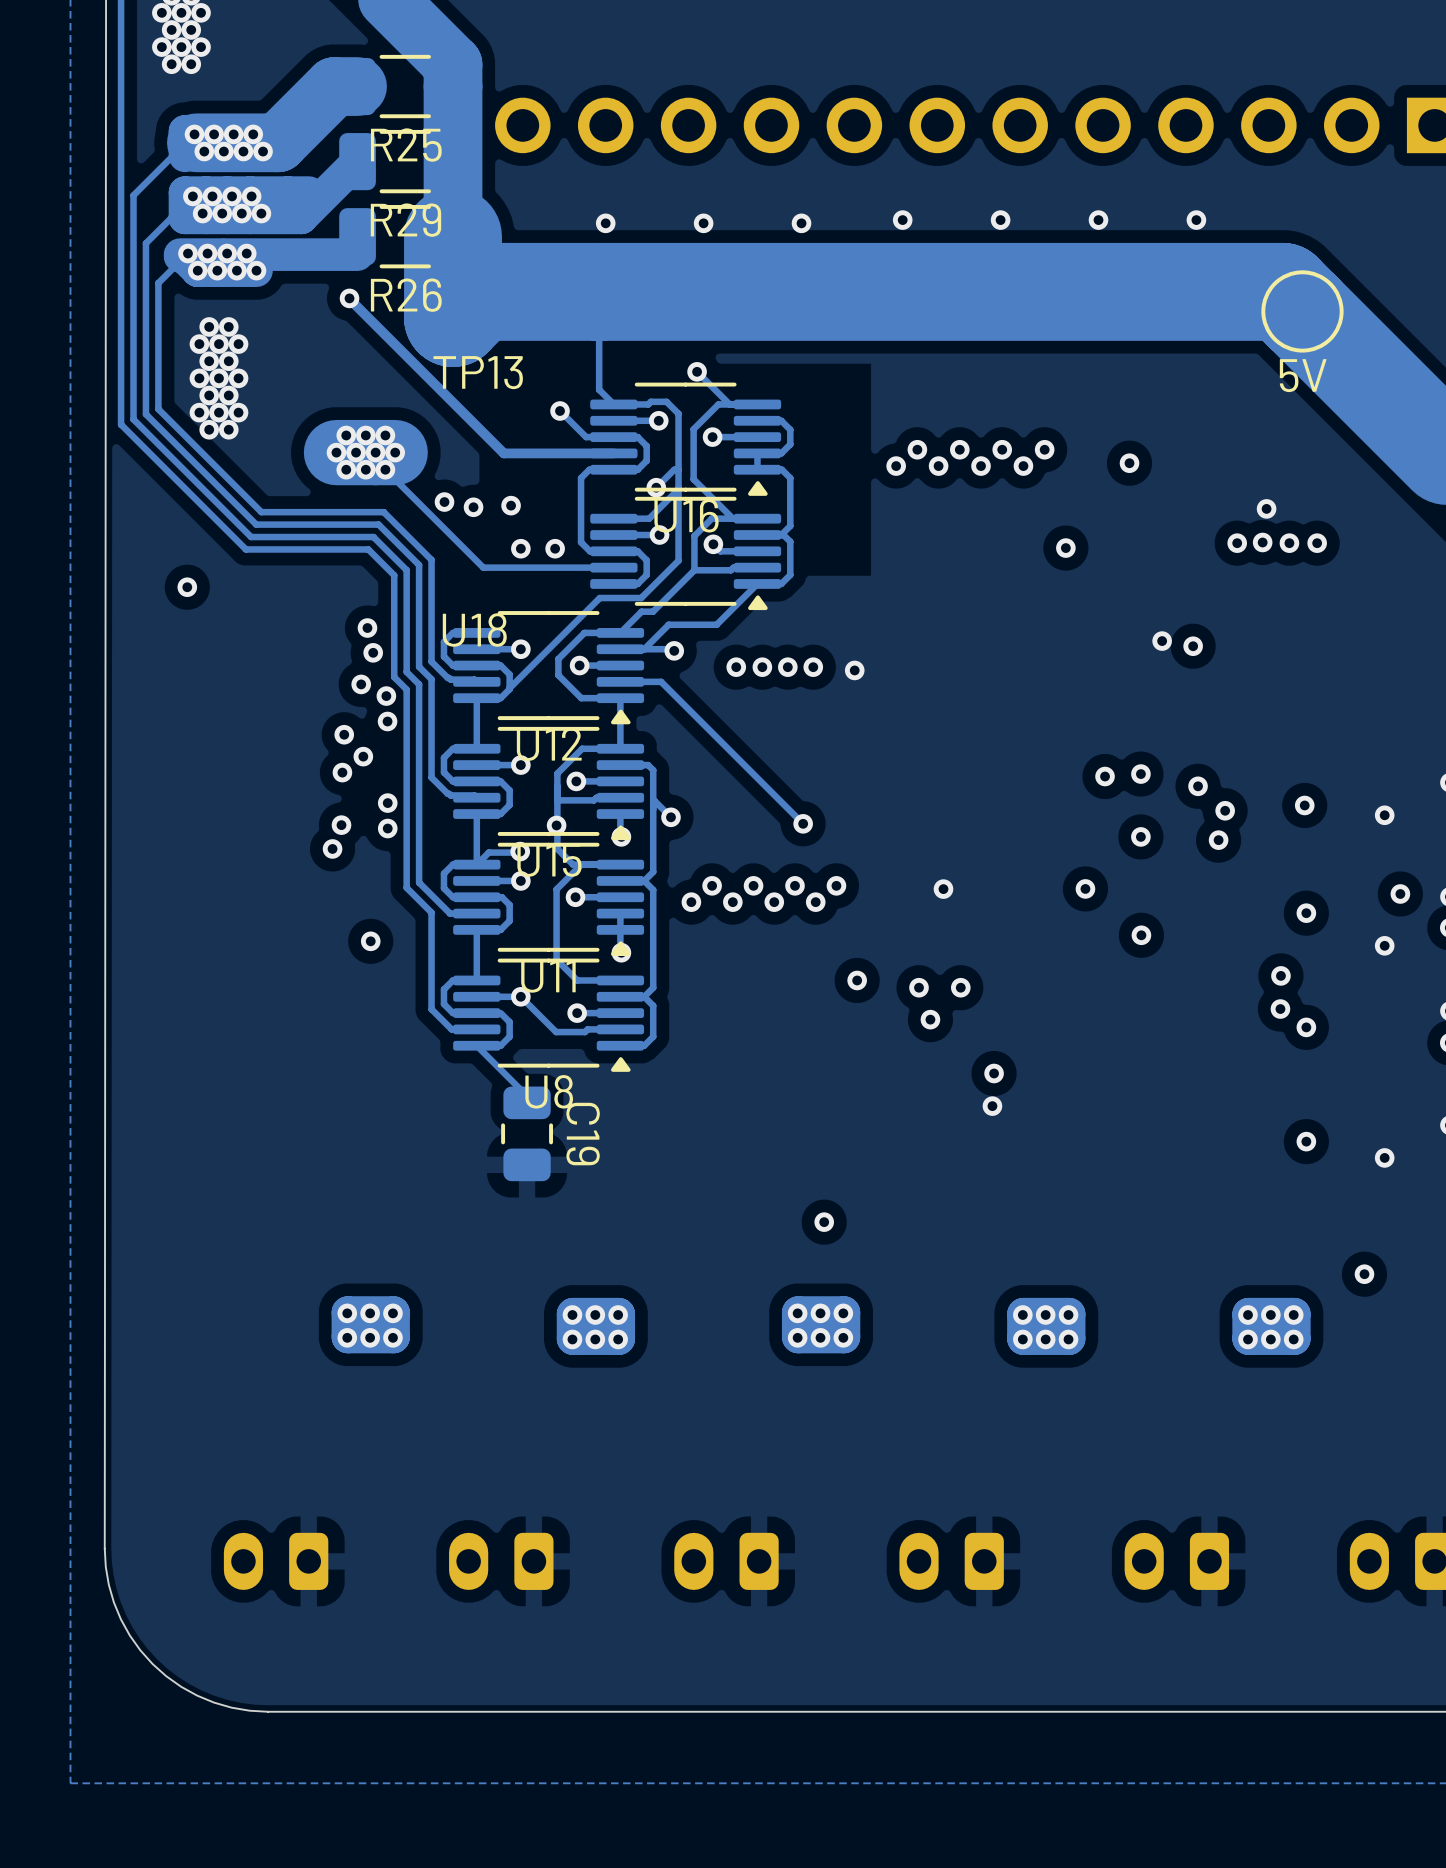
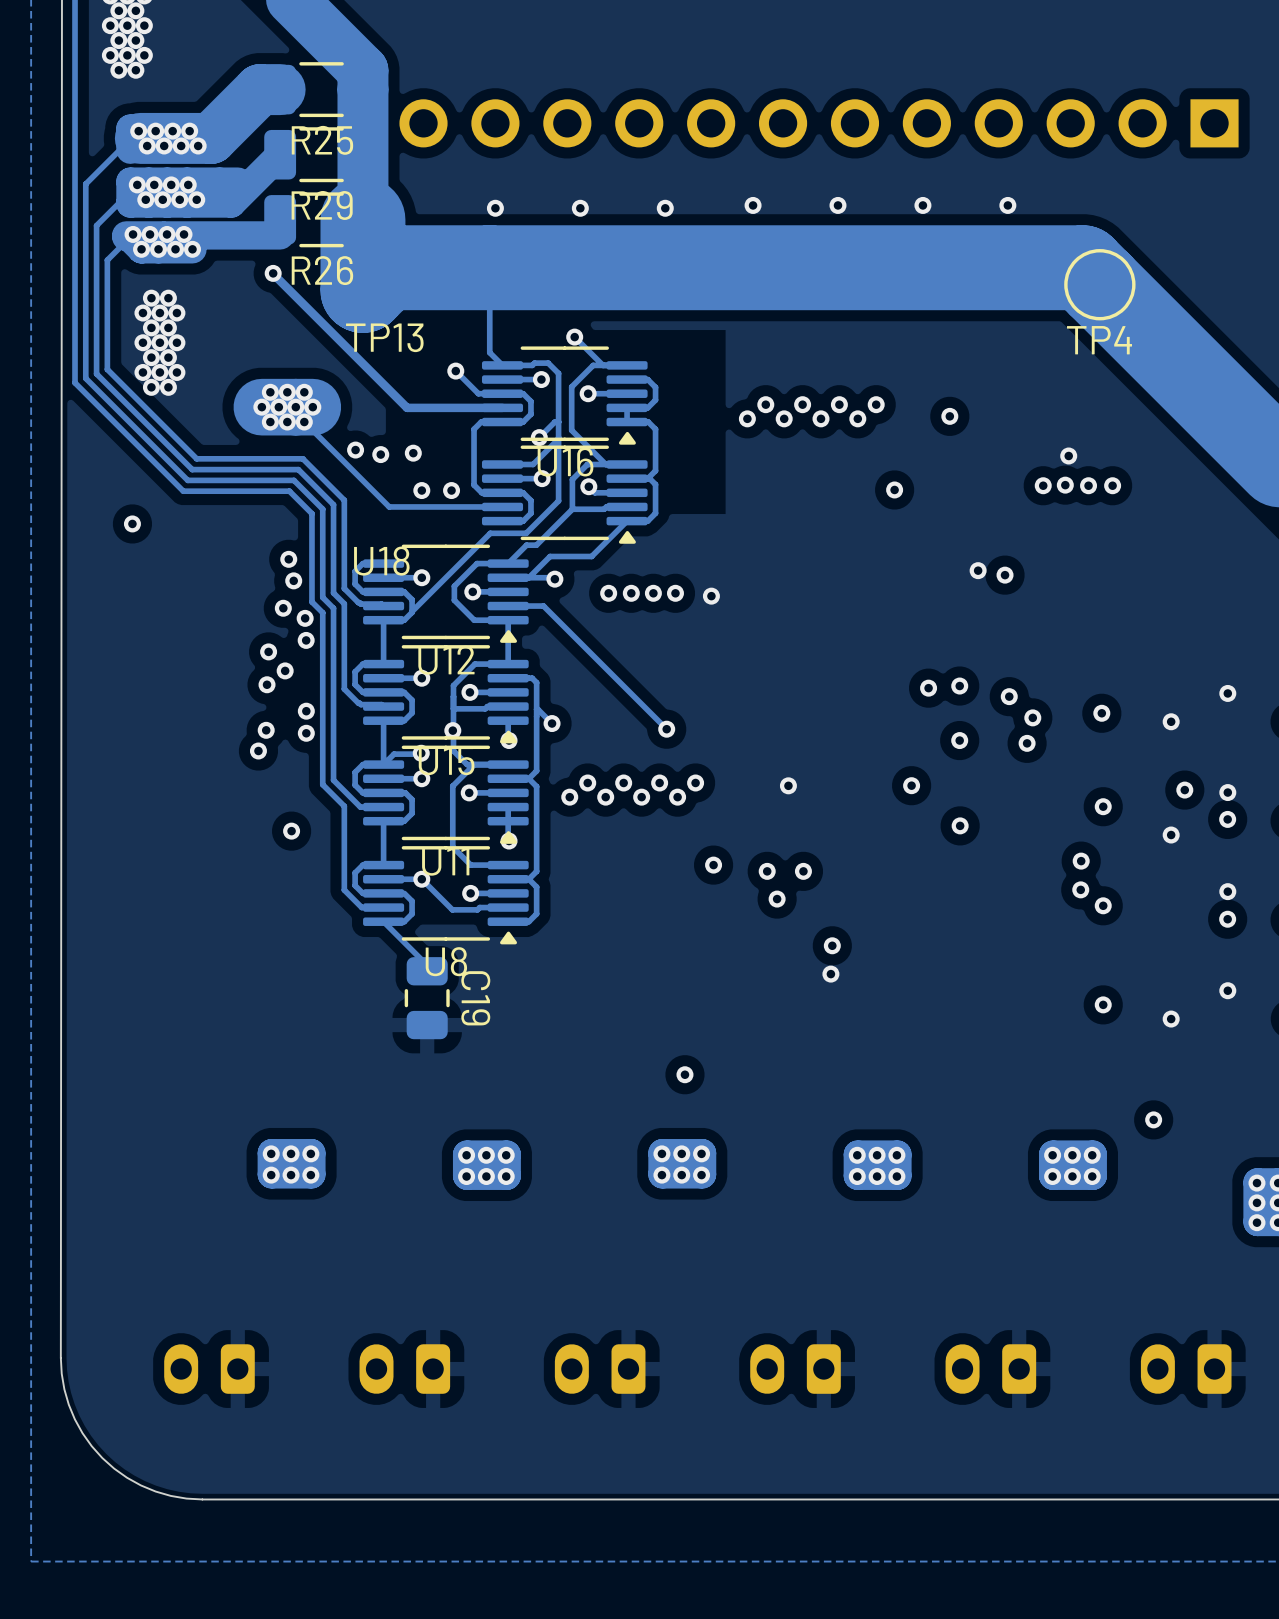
5V name: 5V (1303, 375) -> TP4 (1099, 340)

